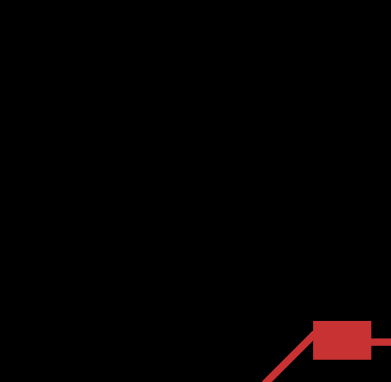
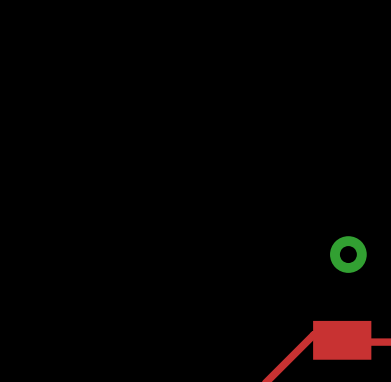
via: none -> (348, 254)

